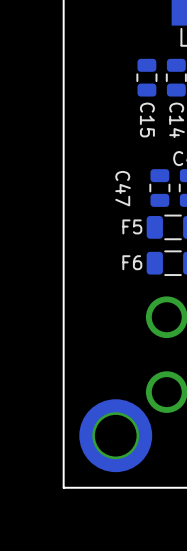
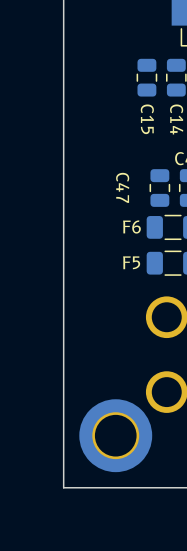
F5 name: F5 (132, 226) -> F6 (131, 227)
F6 name: F6 (132, 262) -> F5 (131, 262)

